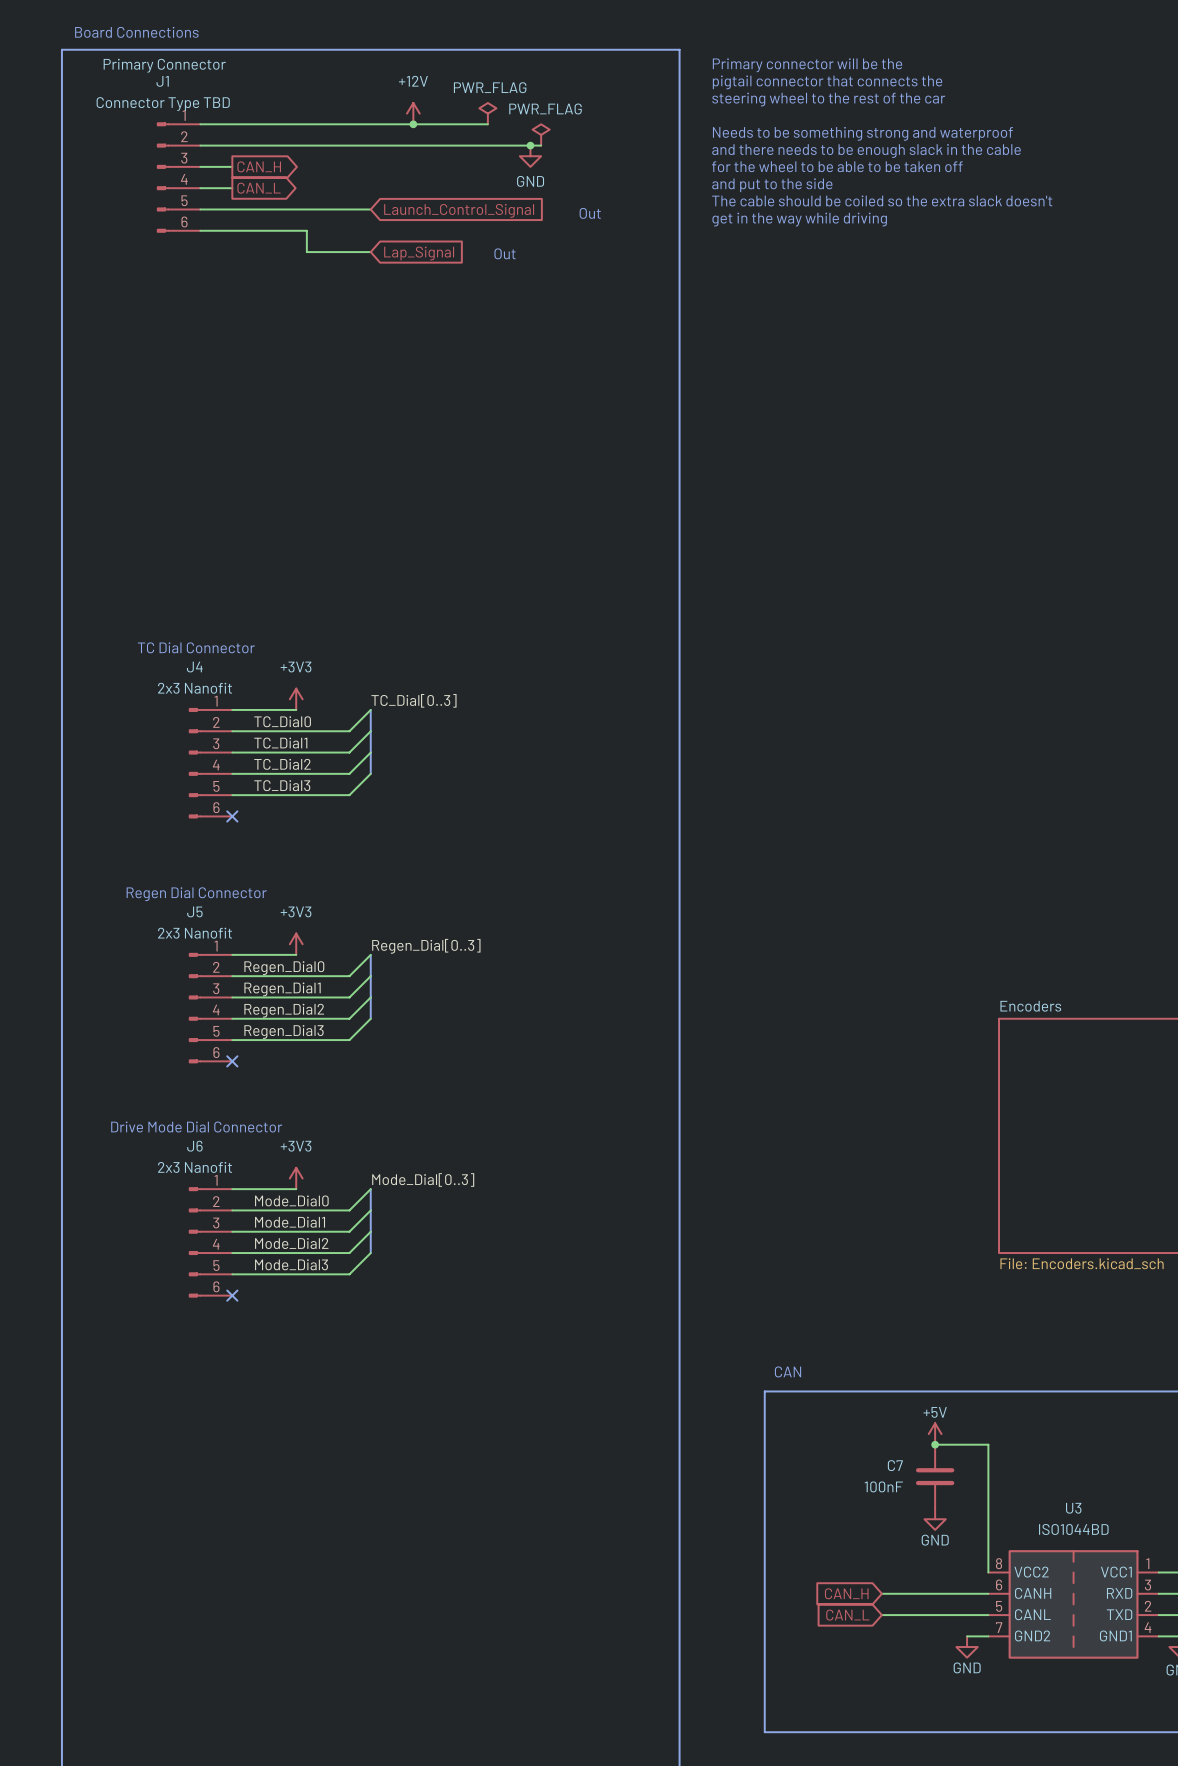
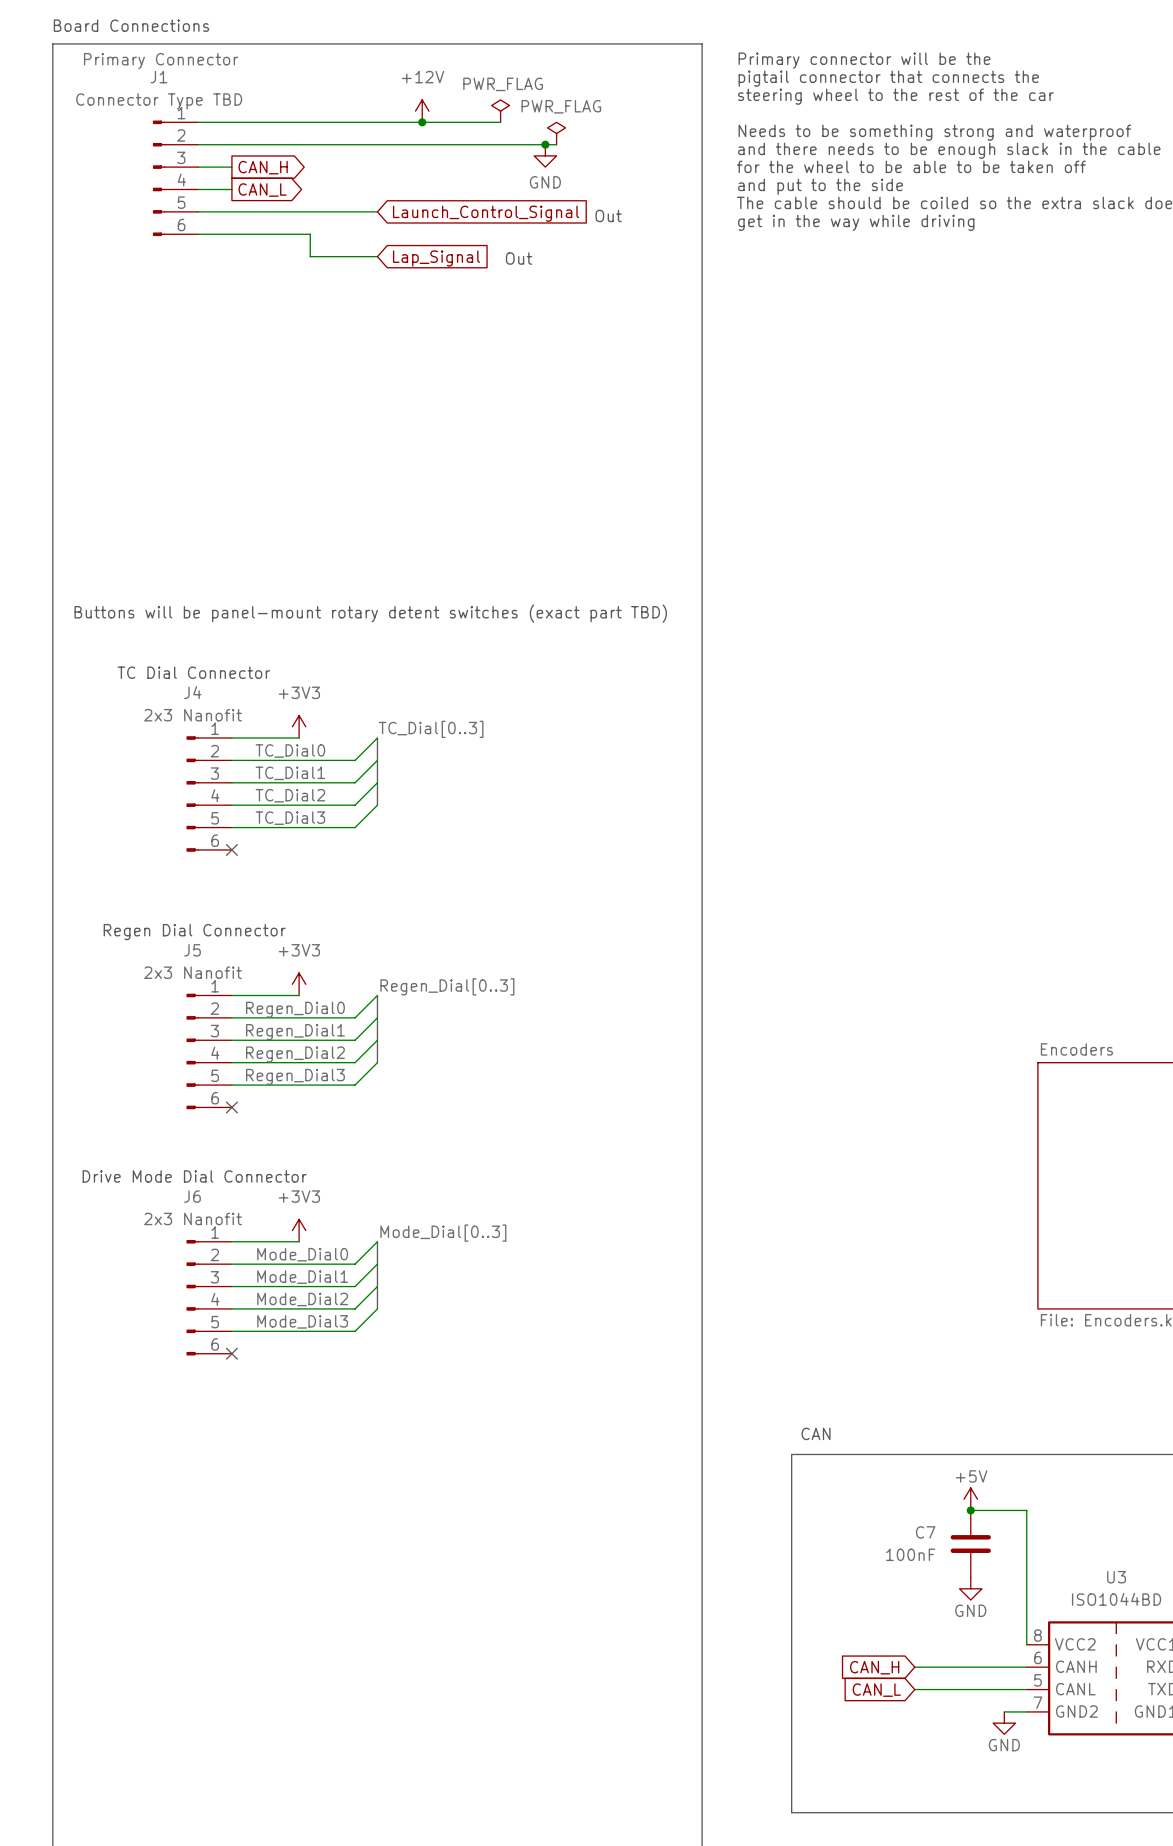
text: none -> Buttons will be panel-mount rotary detent switches (exact part TBD) (370, 613)

